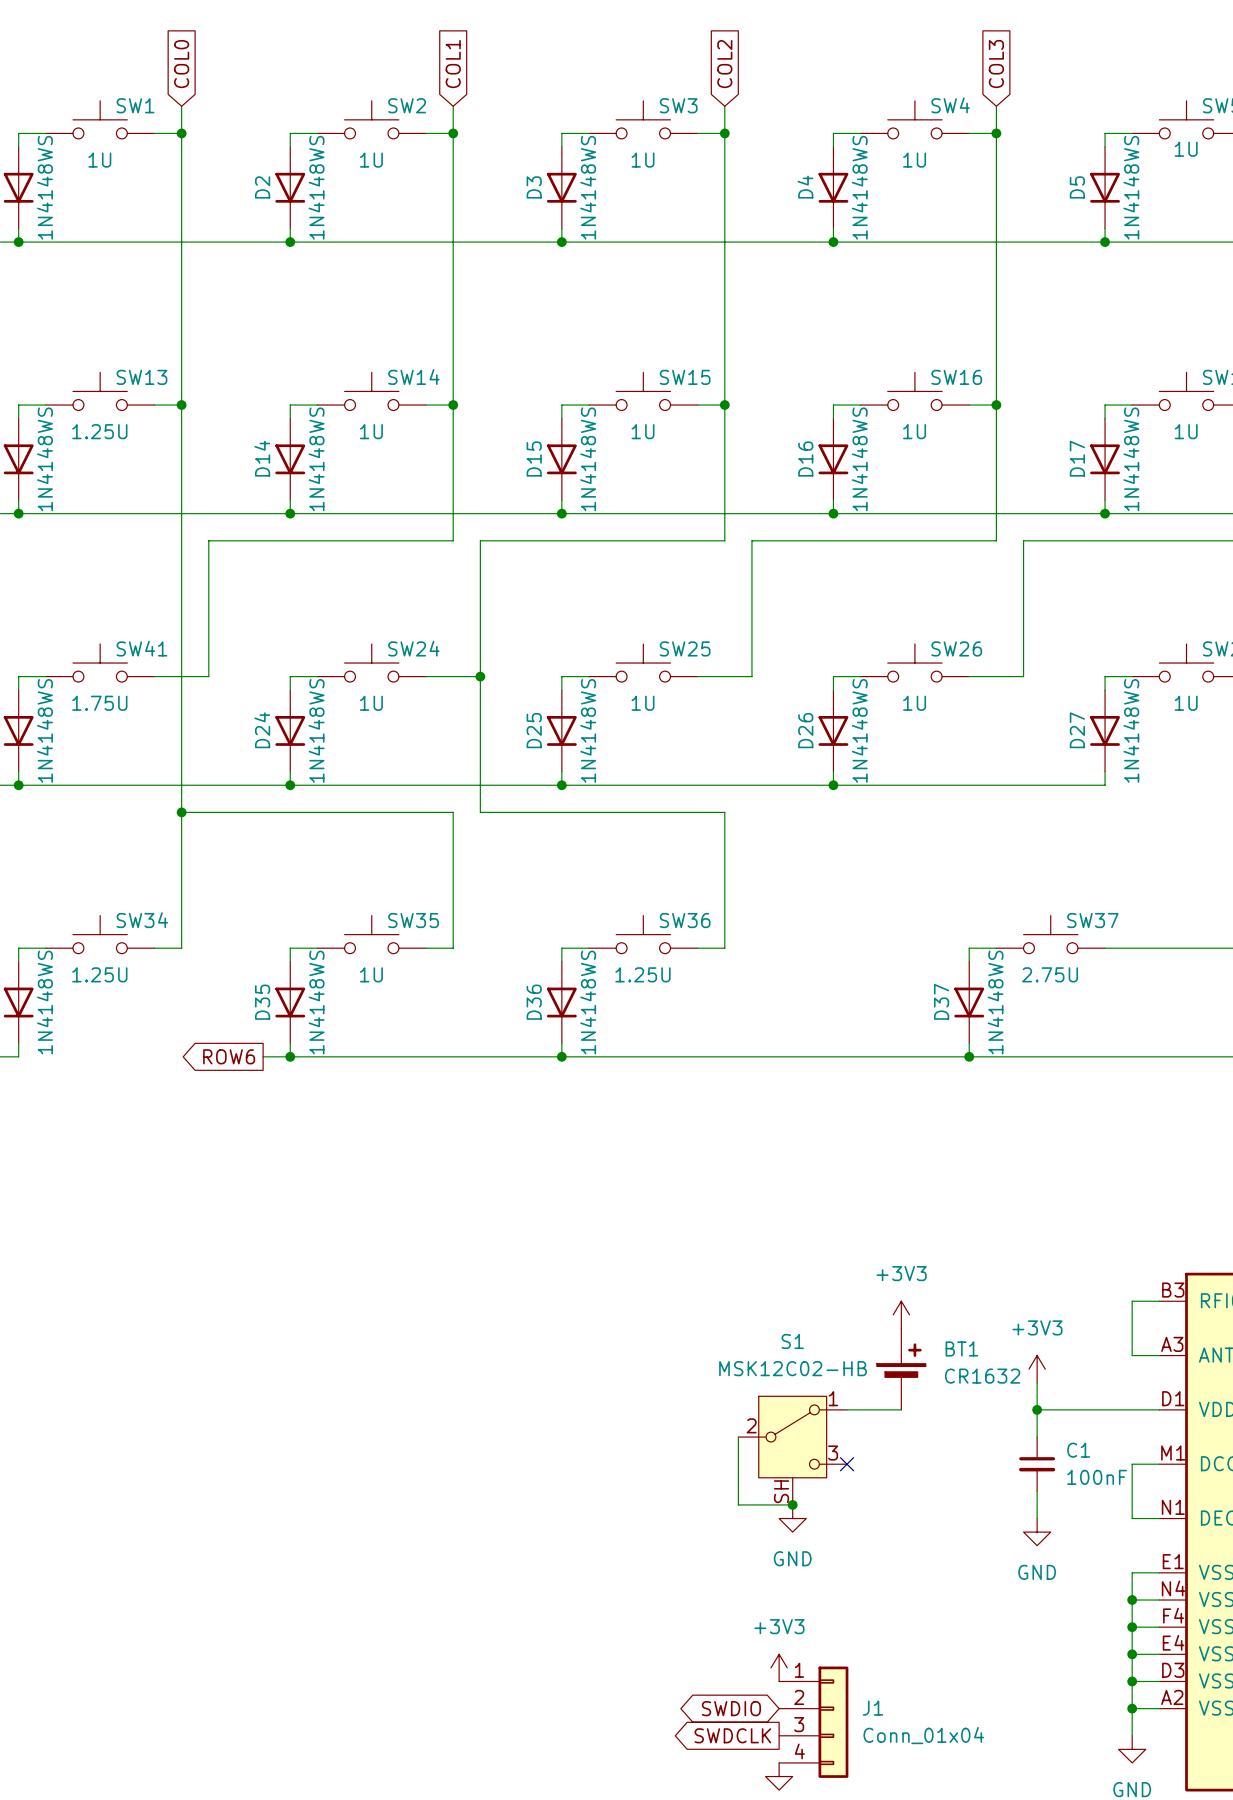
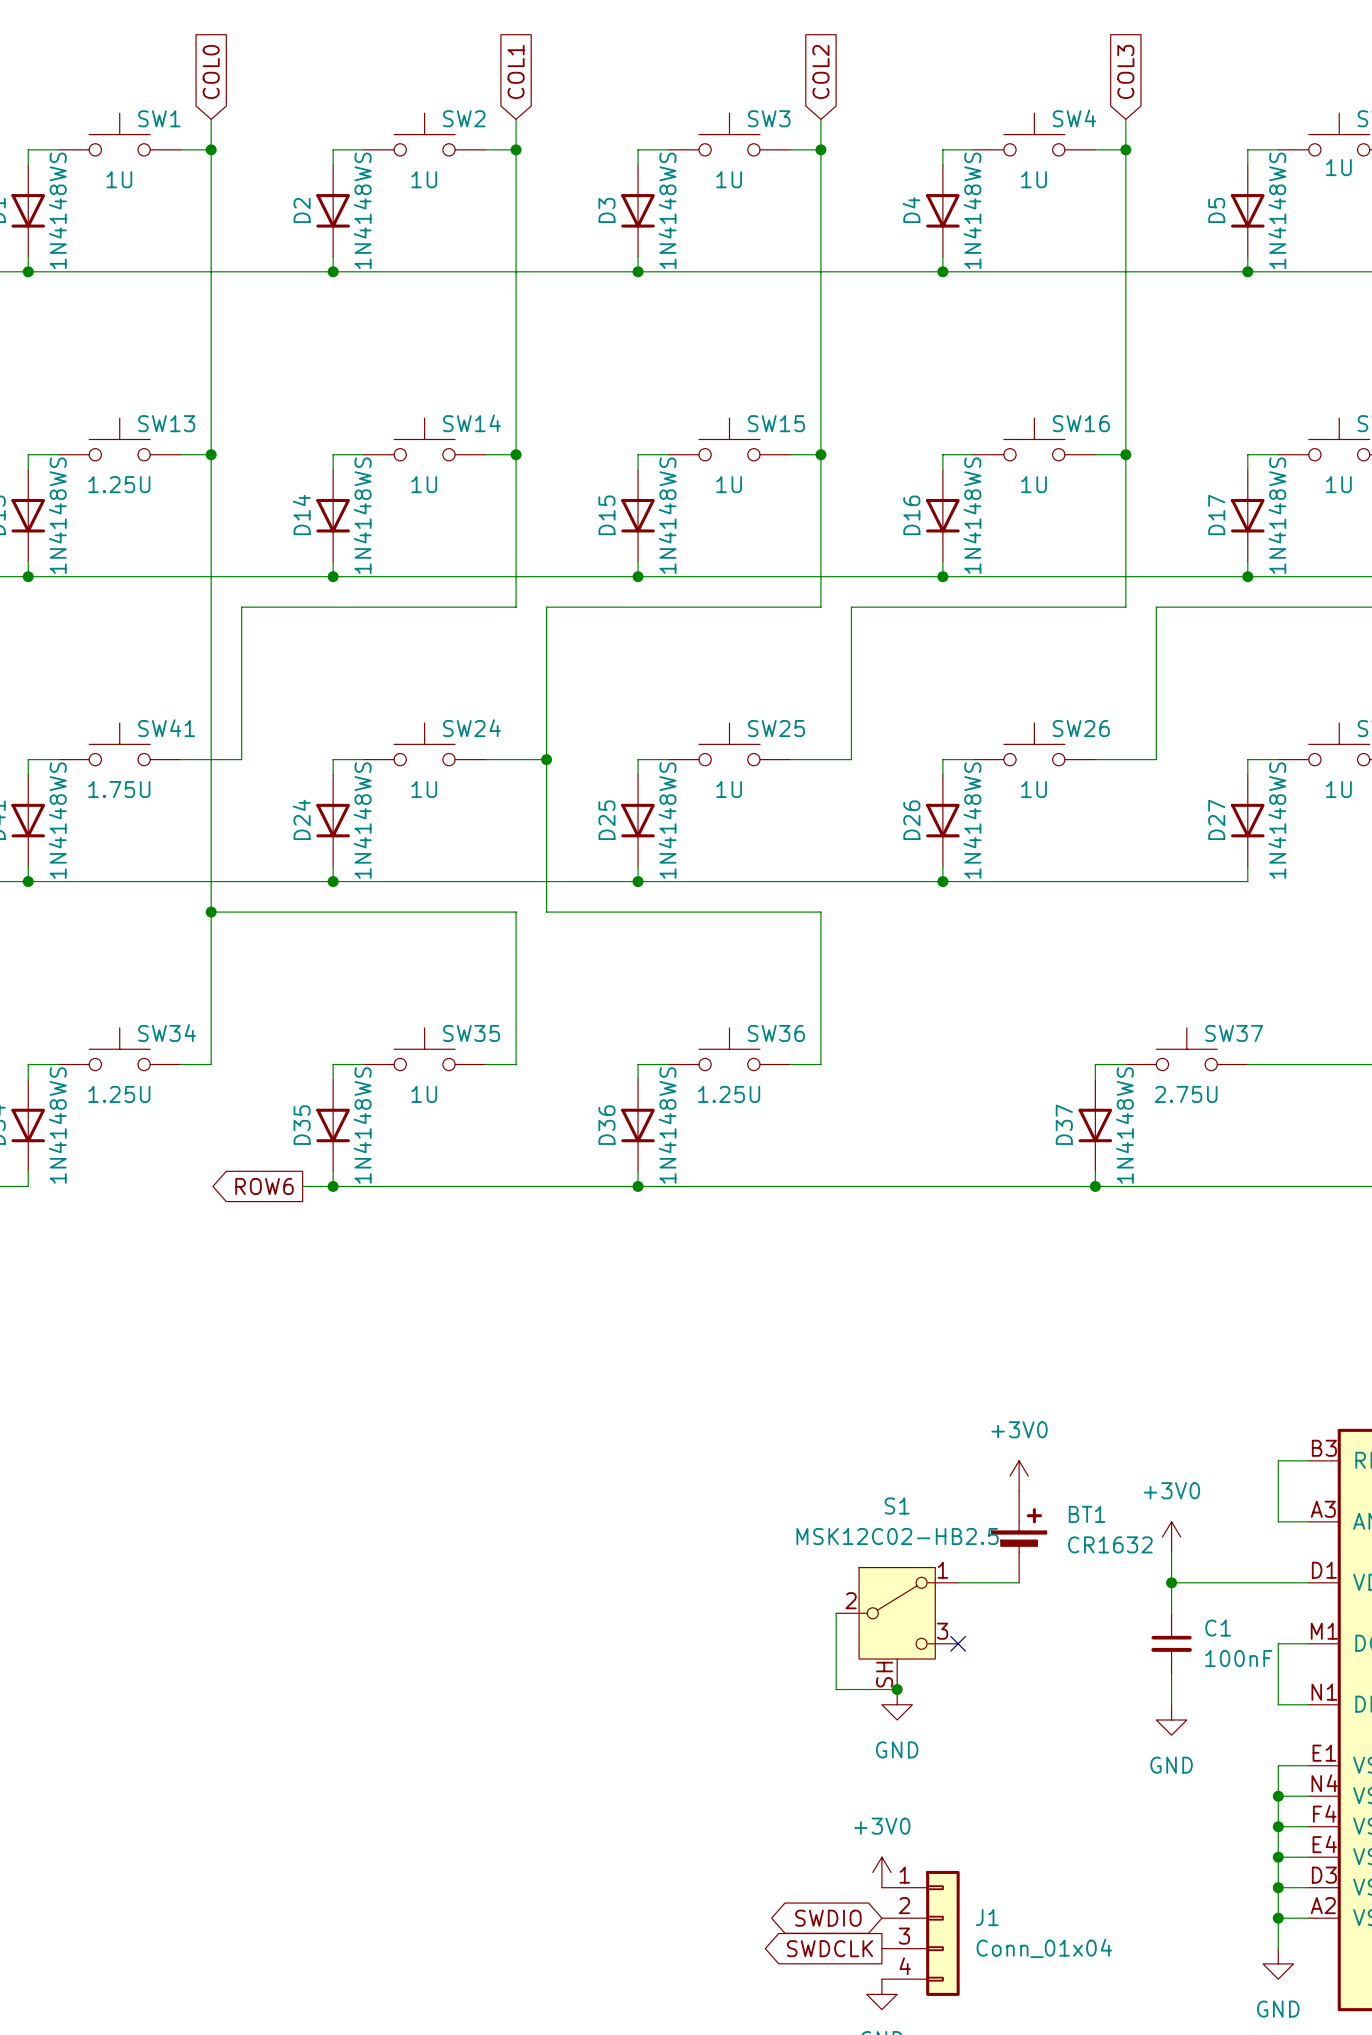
power symbol: +3V3 (901, 1314) -> +3V0 (1019, 1476)
S1 value: MSK12C02-HB (793, 1368) -> MSK12C02-HB2.5 (897, 1536)
power symbol: +3V3 (1037, 1369) -> +3V0 (1171, 1537)
power symbol: +3V3 (779, 1667) -> +3V0 (881, 1872)

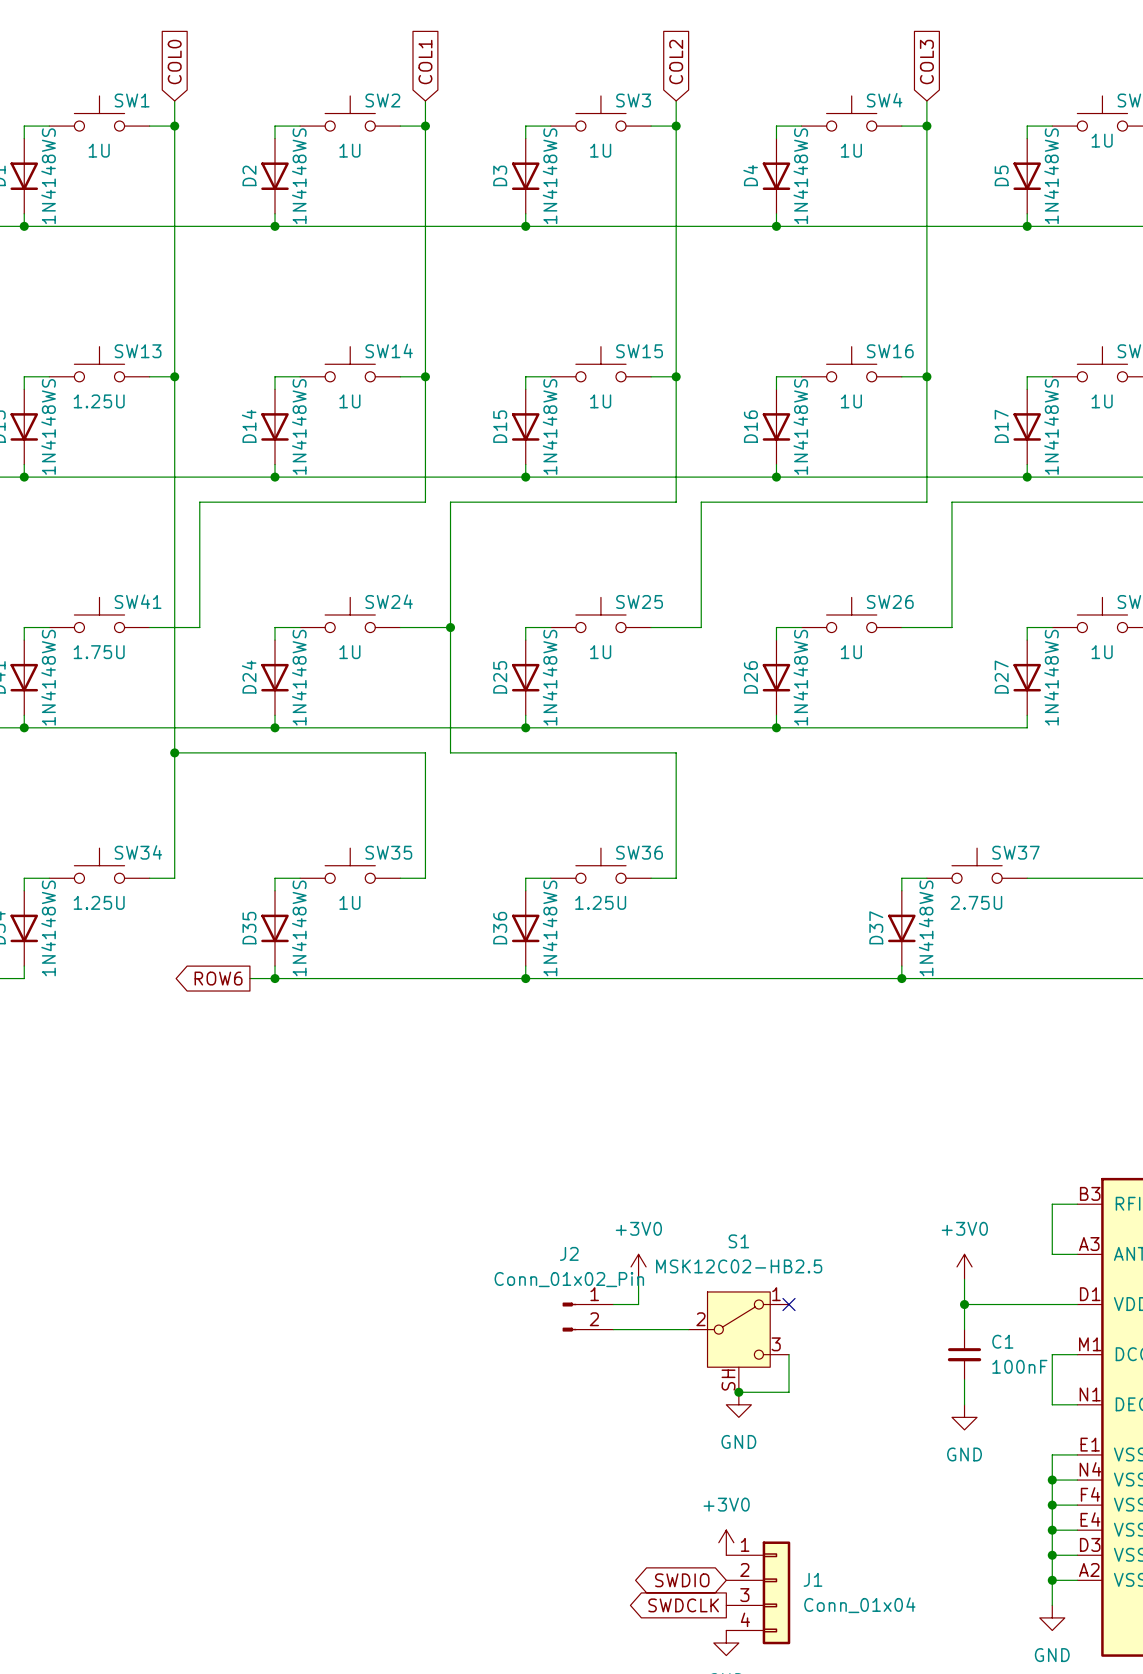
power symbol position: +3V0 (1019, 1476) -> +3V0 (638, 1266)
BT1: CR1632 (1019, 1537) -> none
wire: none -> (638, 1279) (638, 1304) (613, 1304)
wire: (958, 1582) (1019, 1582) -> none
J2: none -> Conn_01x02_Pin (588, 1317)
wire: none -> (613, 1329) (688, 1329)
wire: (836, 1613) (836, 1689) (897, 1689) -> (789, 1354) (789, 1392) (738, 1392)
no-connect mark position: (958, 1643) -> (789, 1304)

